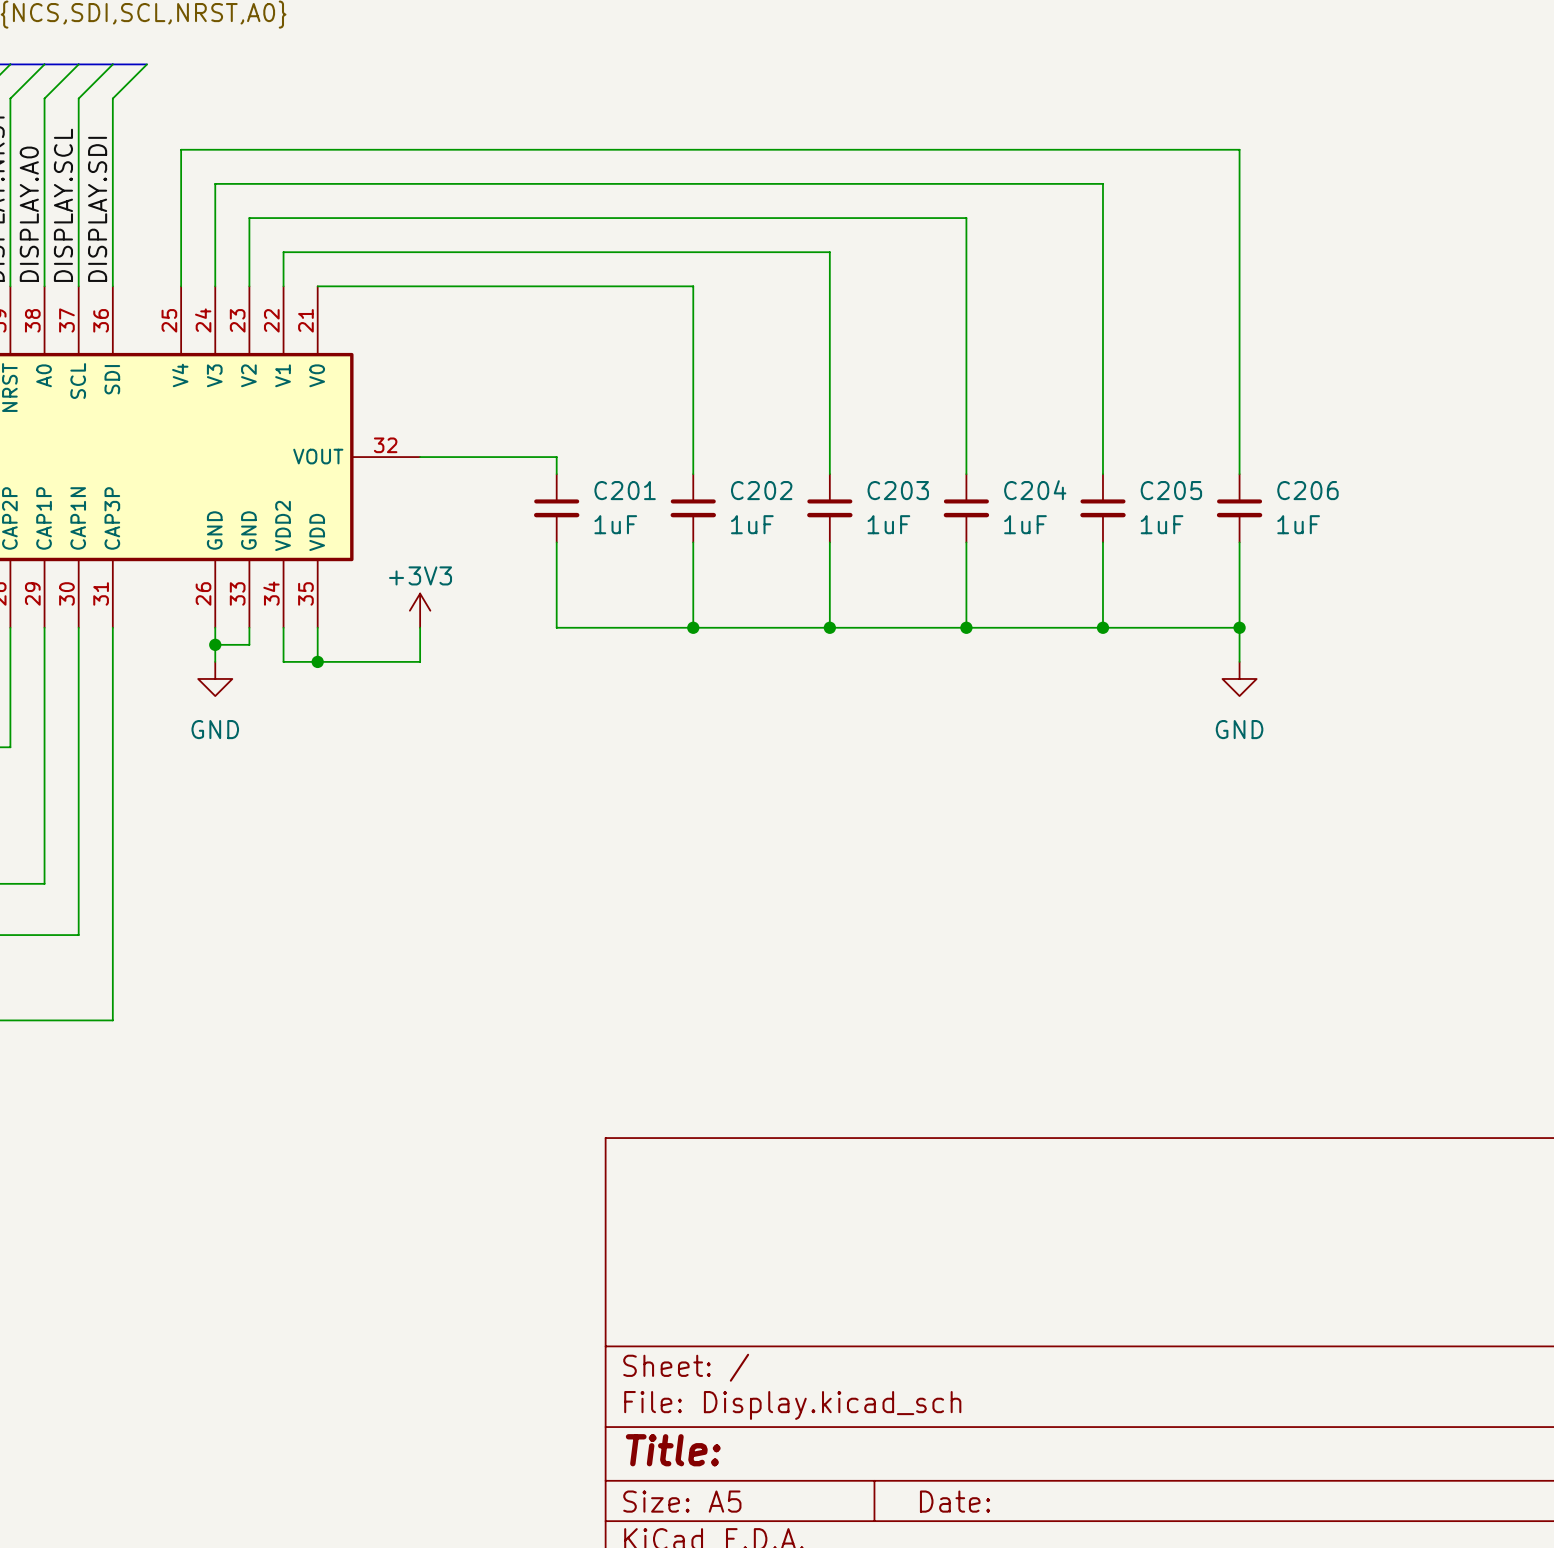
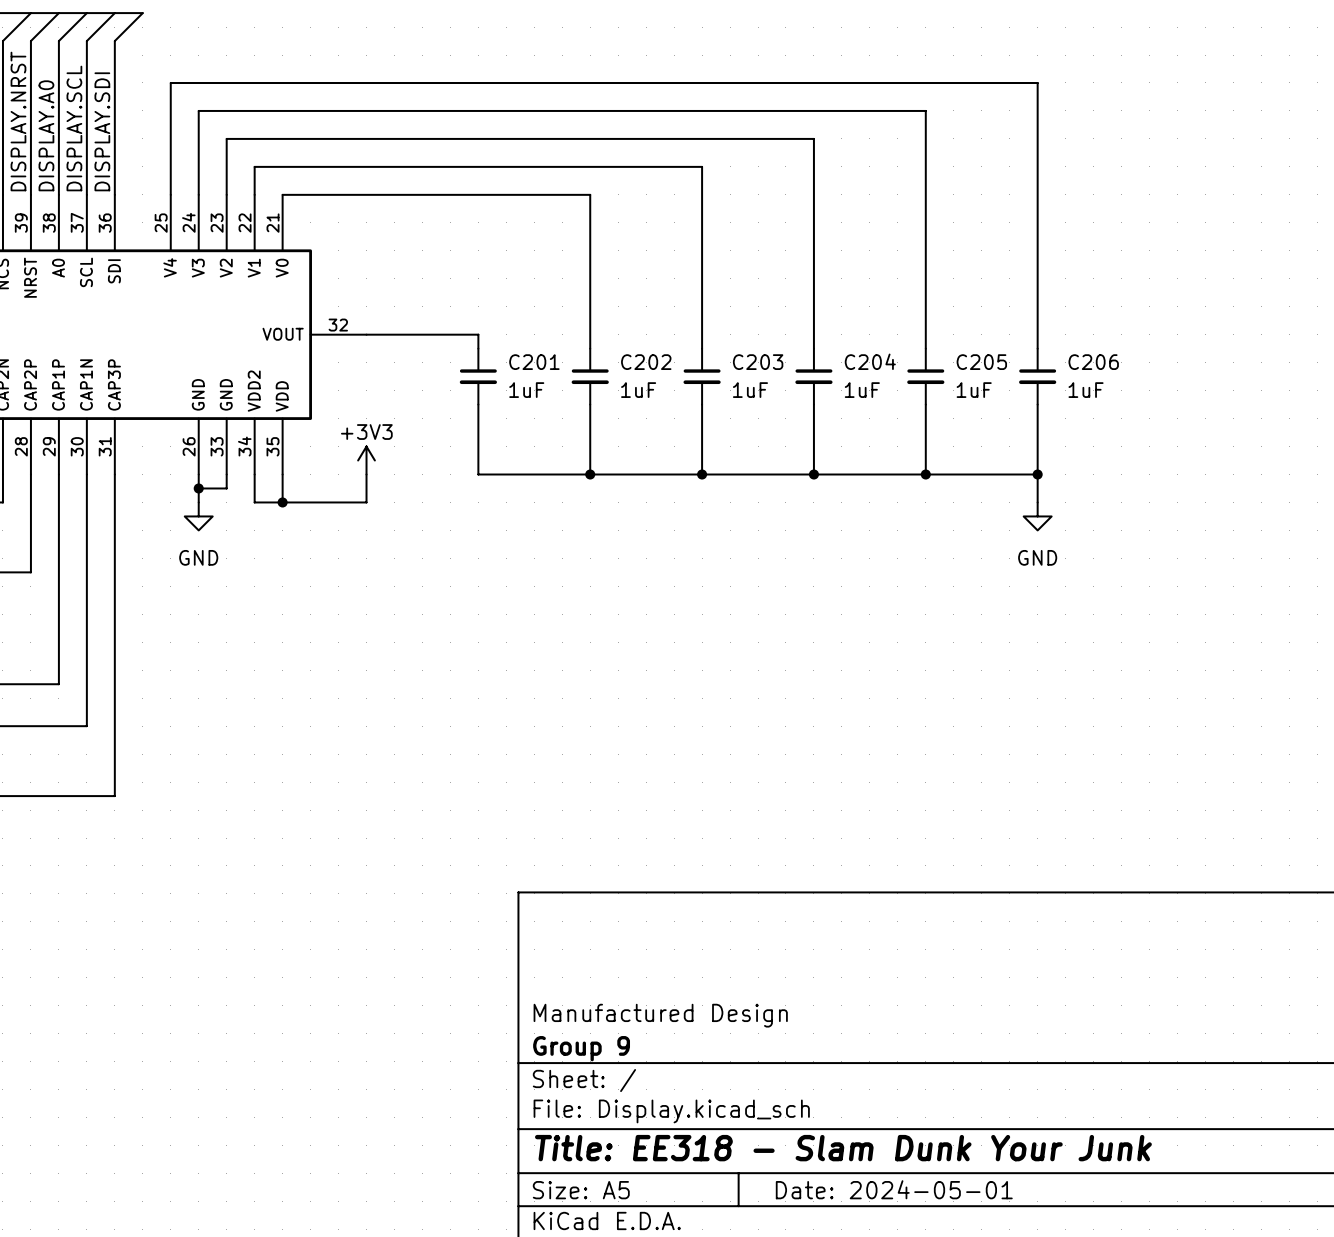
title block: none -> Manufactured Design (660, 1015)
title block: none -> Group 9 (581, 1048)
title block: Title: (673, 1450) -> Title: EE318 - Slam Dunk Your Junk (843, 1148)
title block: Date: (955, 1501) -> Date: 2024-05-01 (894, 1189)

